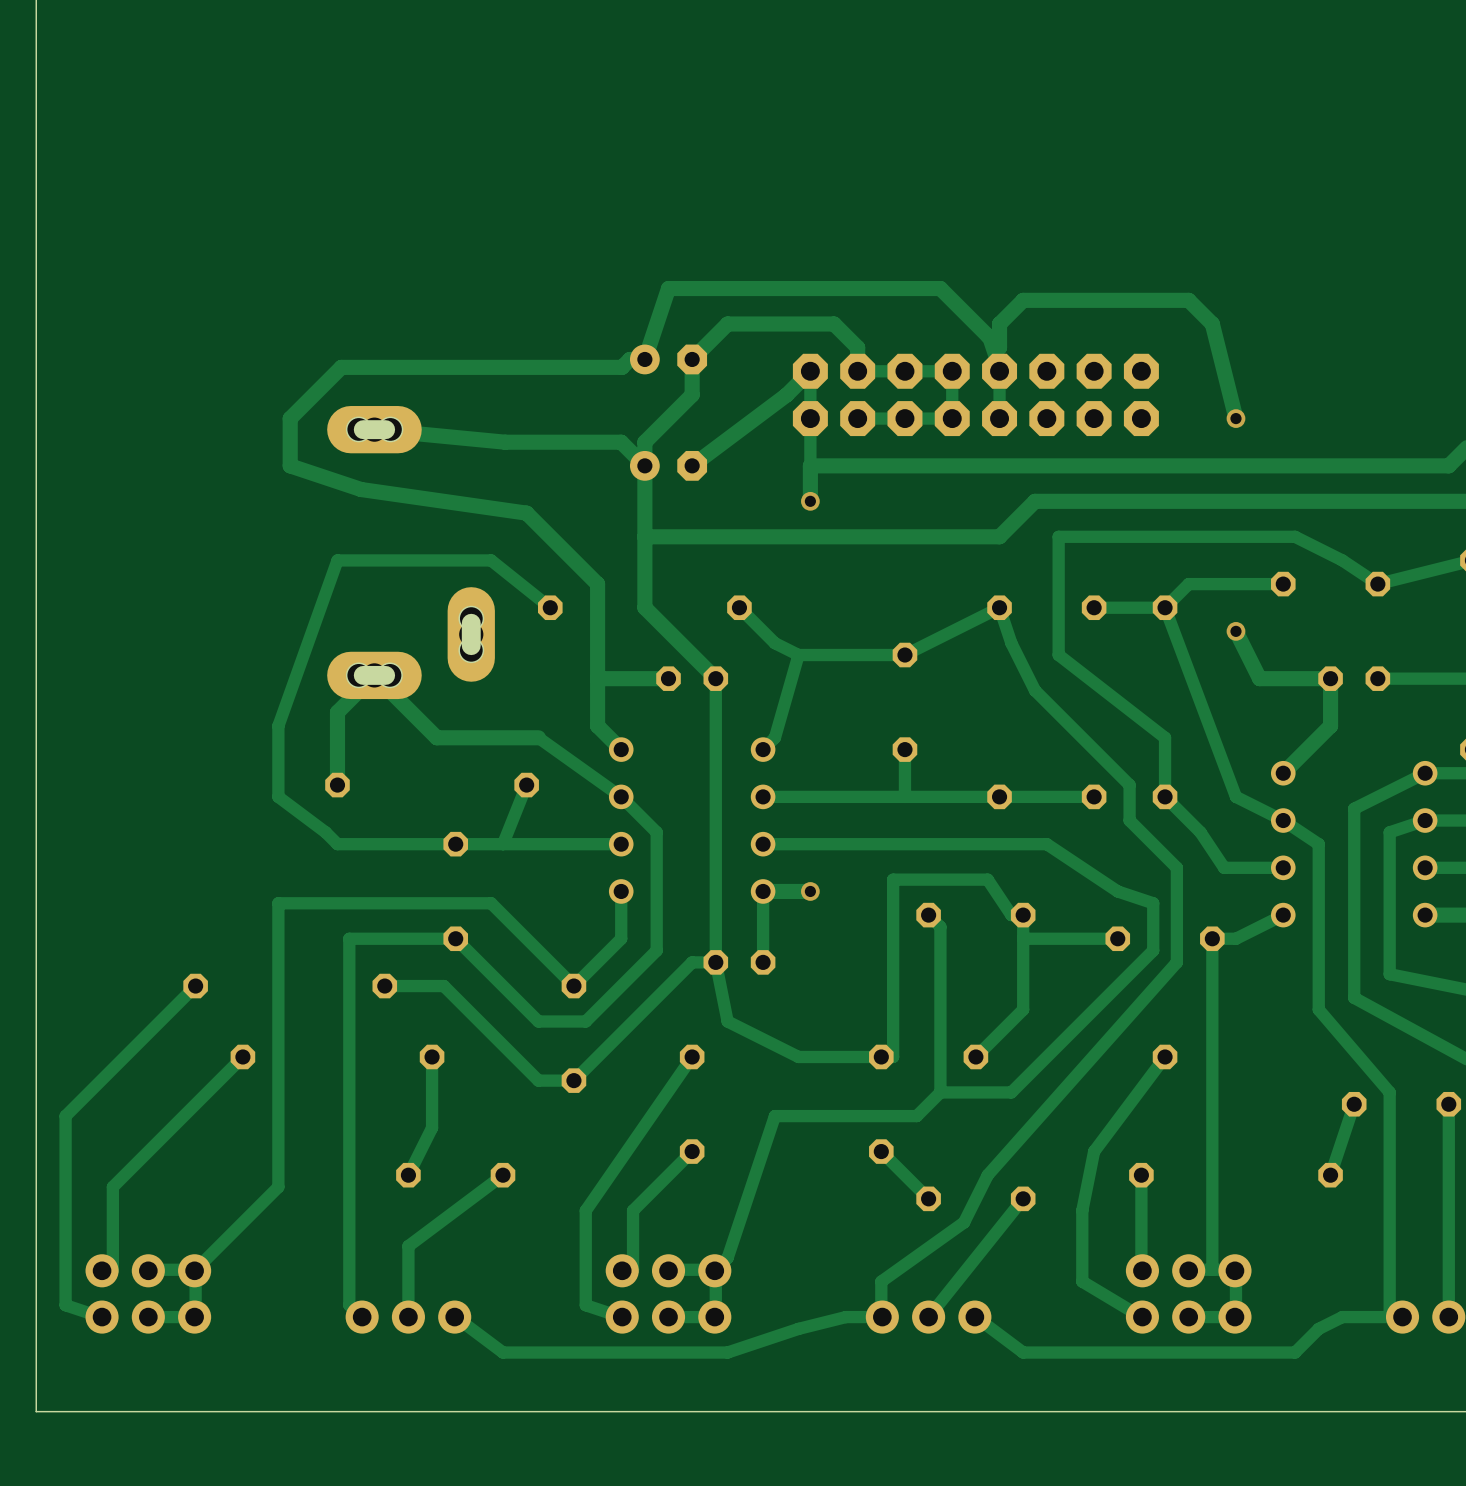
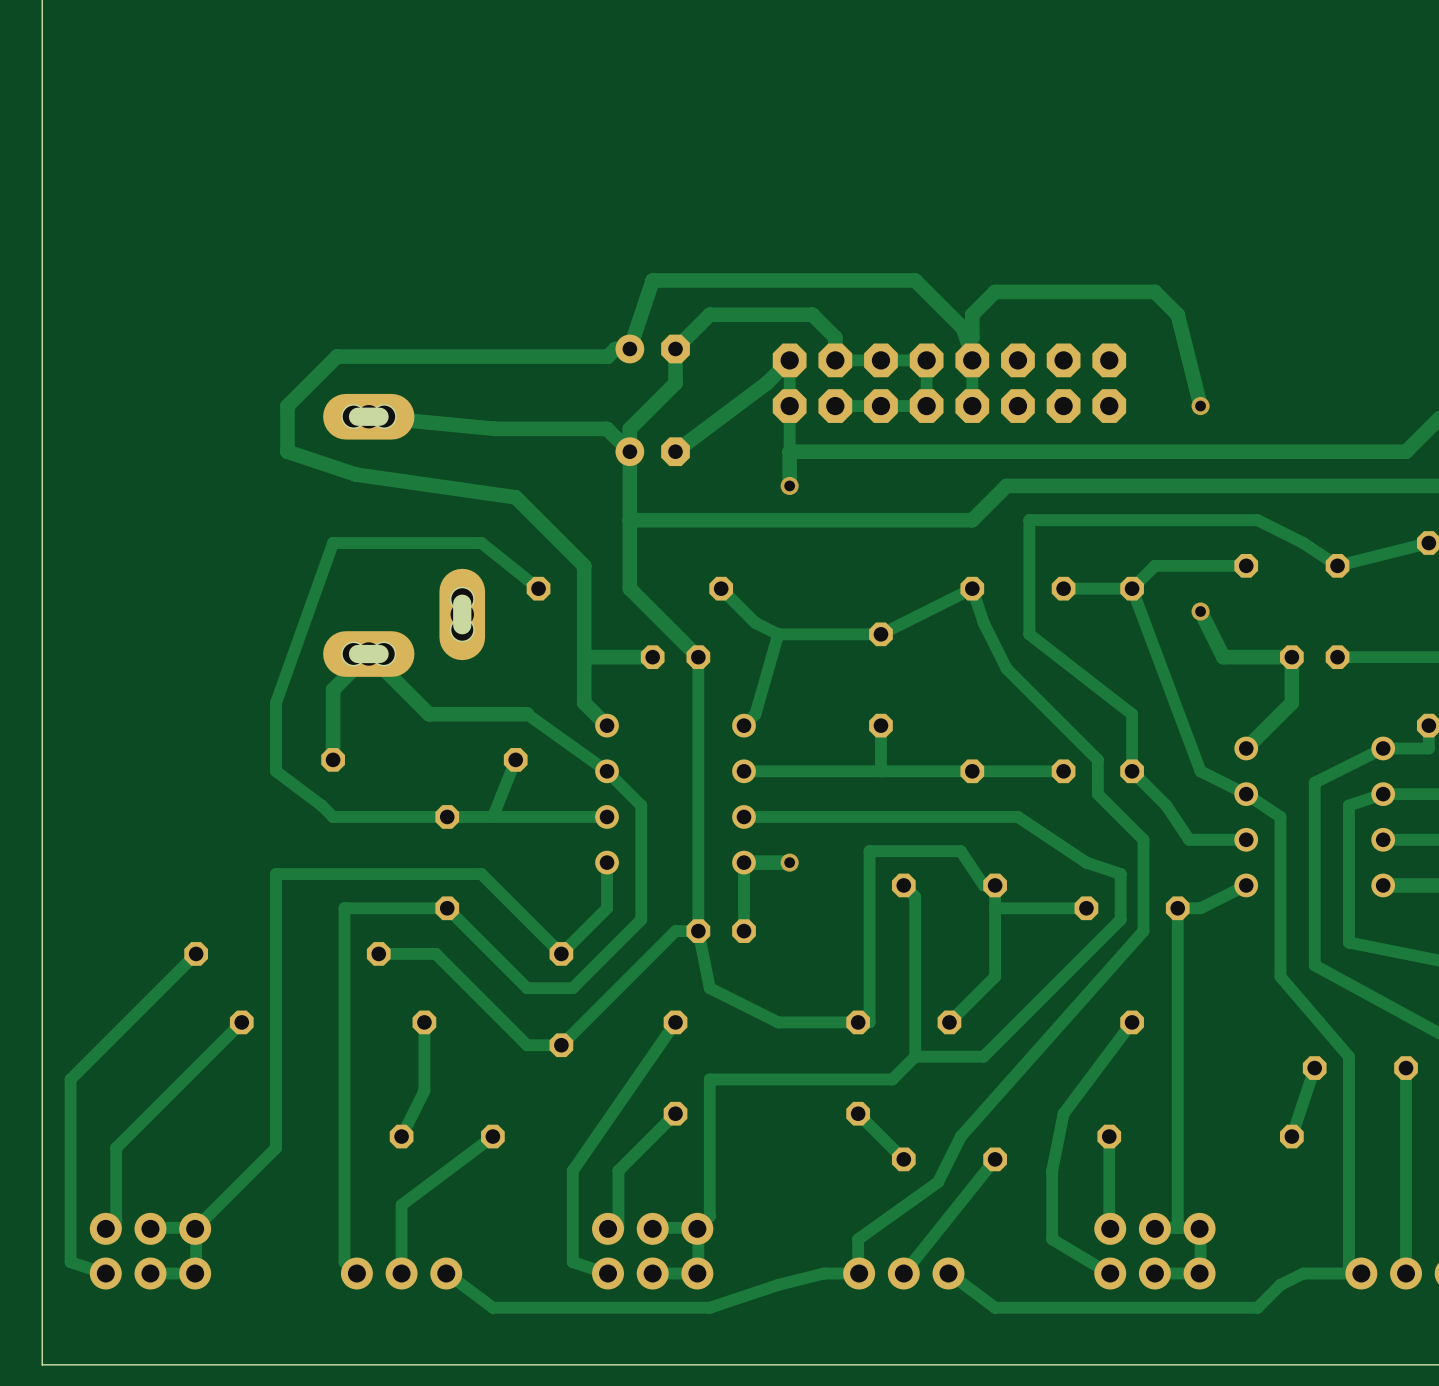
track: (774, 1116) (727, 1257) -> (755, 1079) (709, 1079) (709, 1216)

